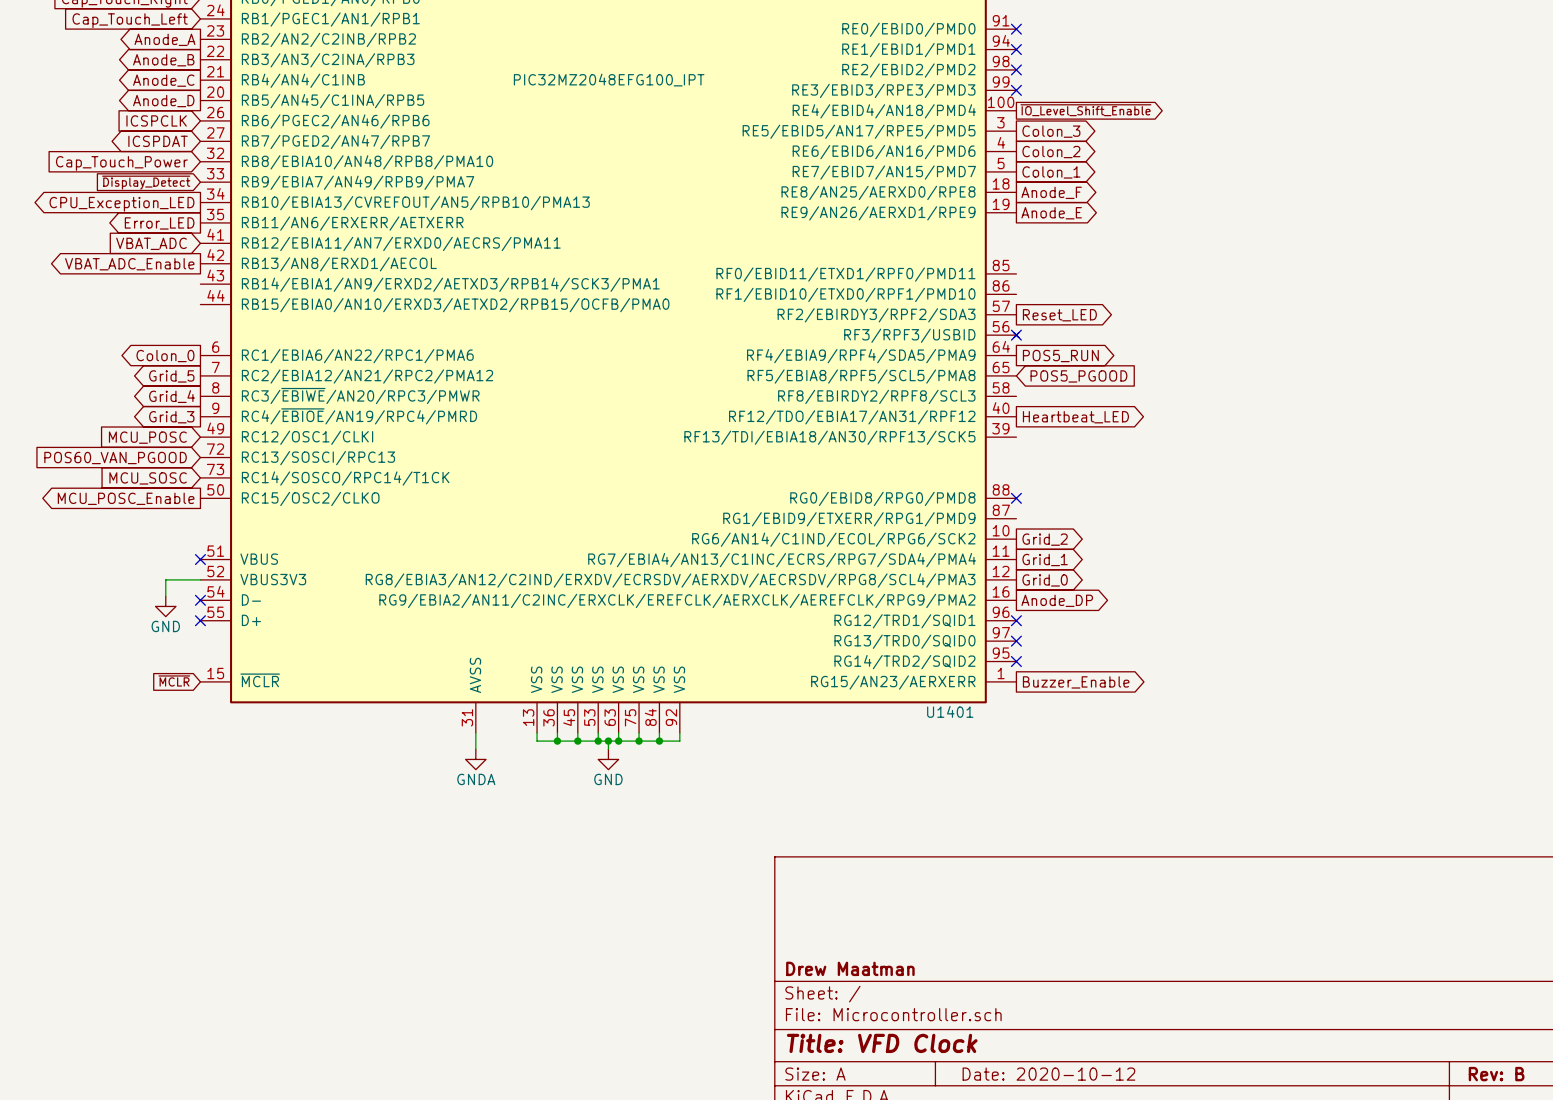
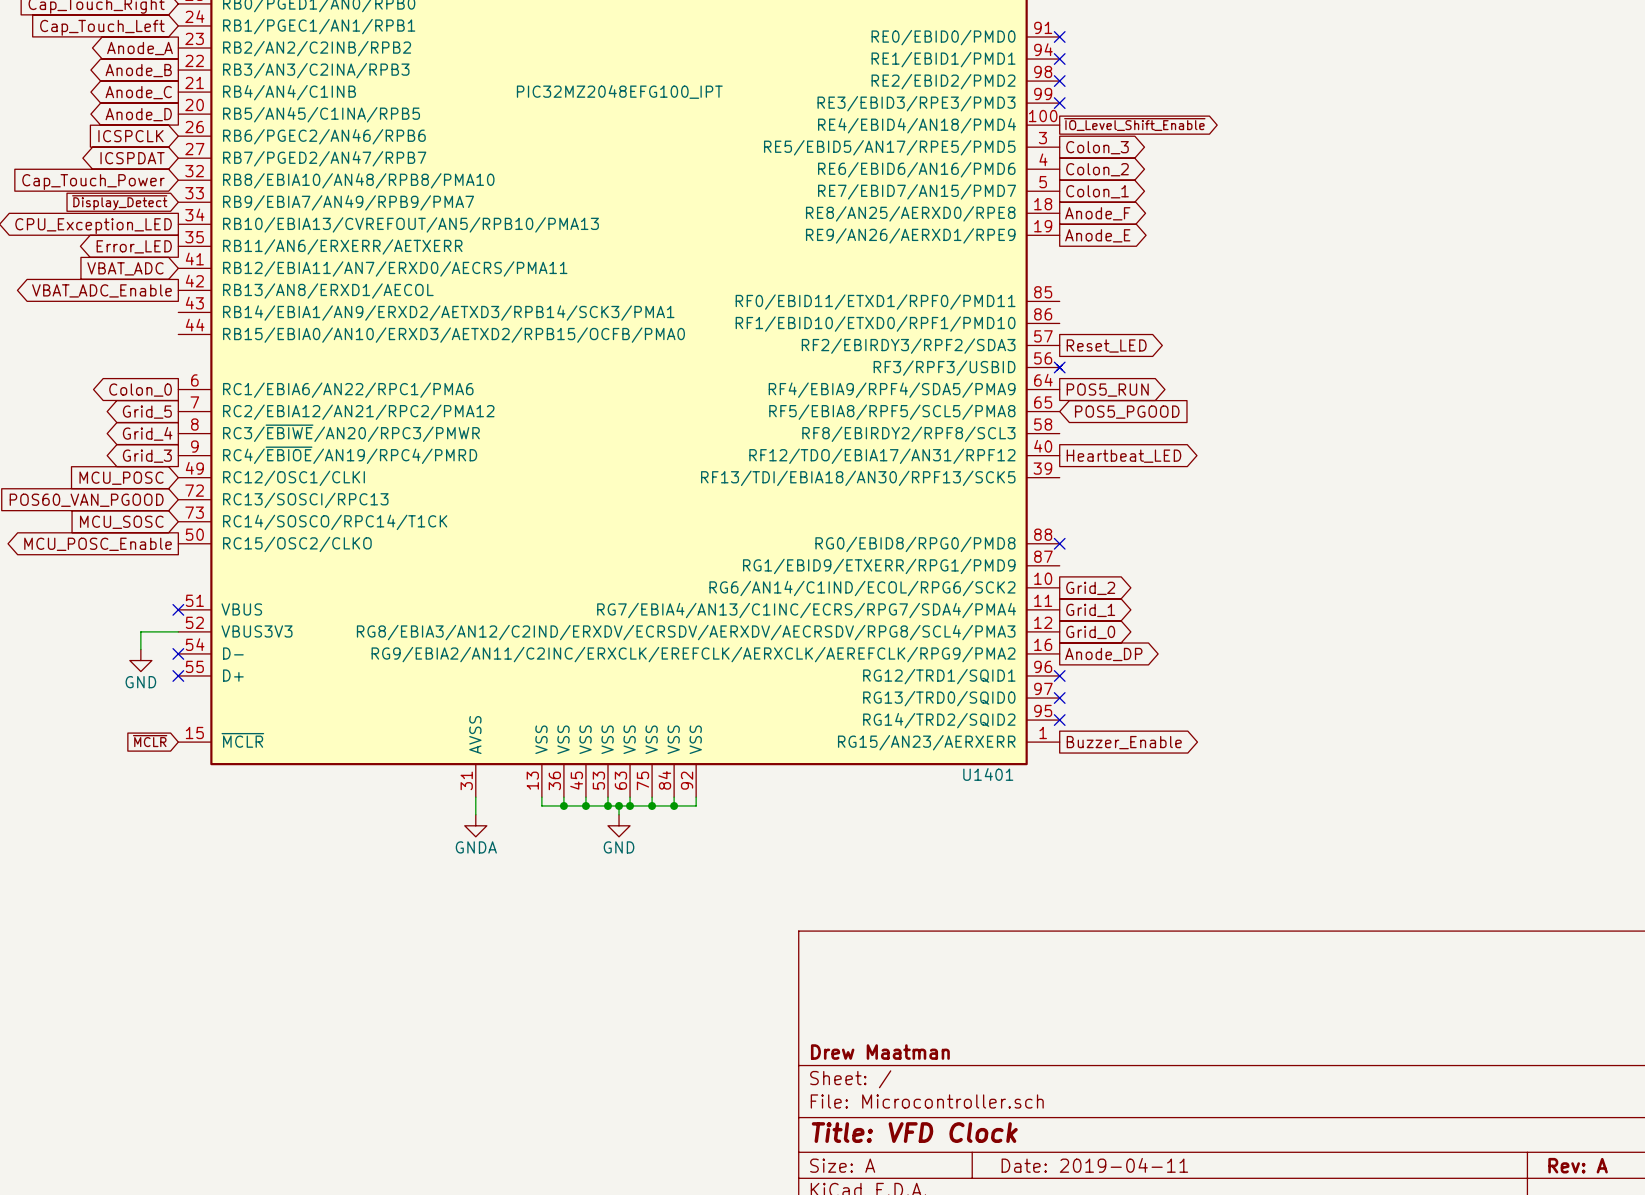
title block: Date: 2020-10-12 (1048, 1074) -> Date: 2019-04-11 (1094, 1165)
title block: Rev: B (1496, 1074) -> Rev: A (1578, 1165)

